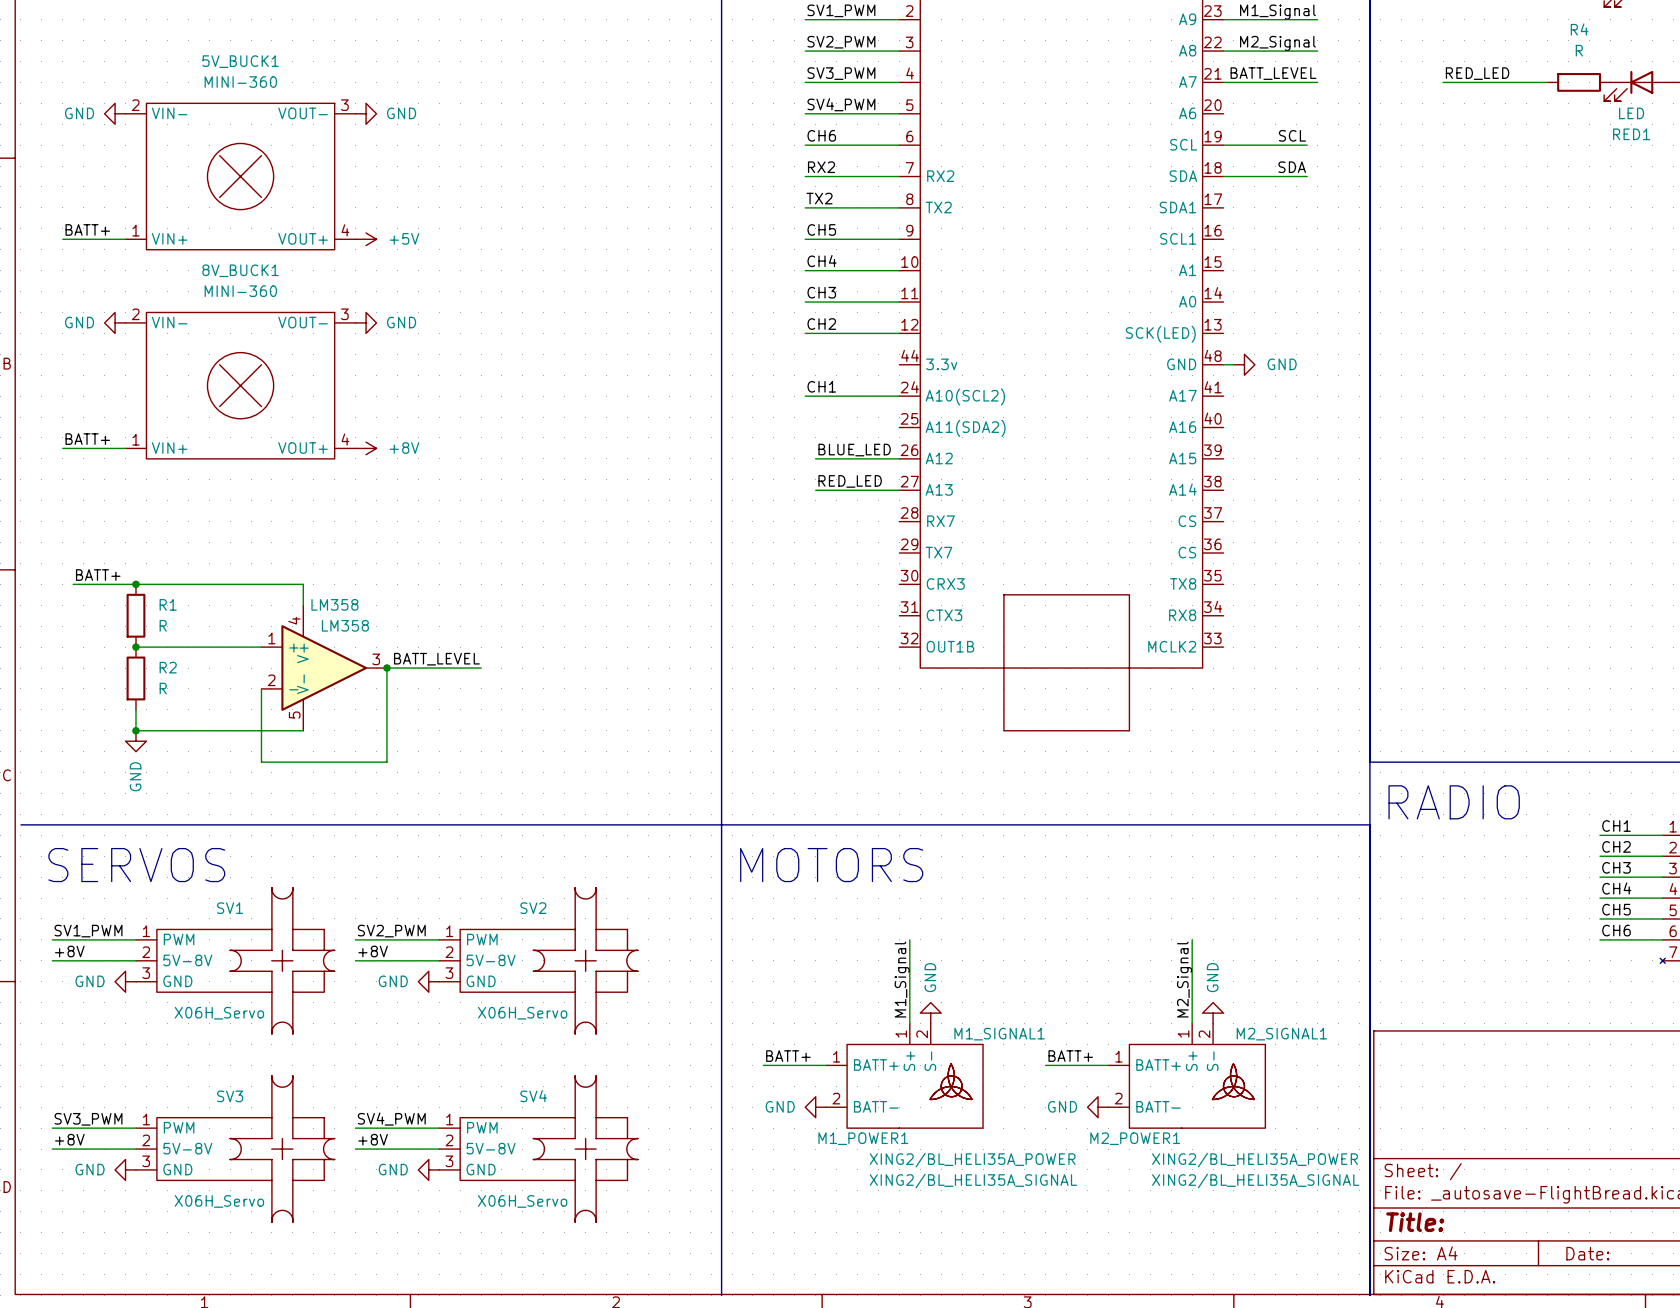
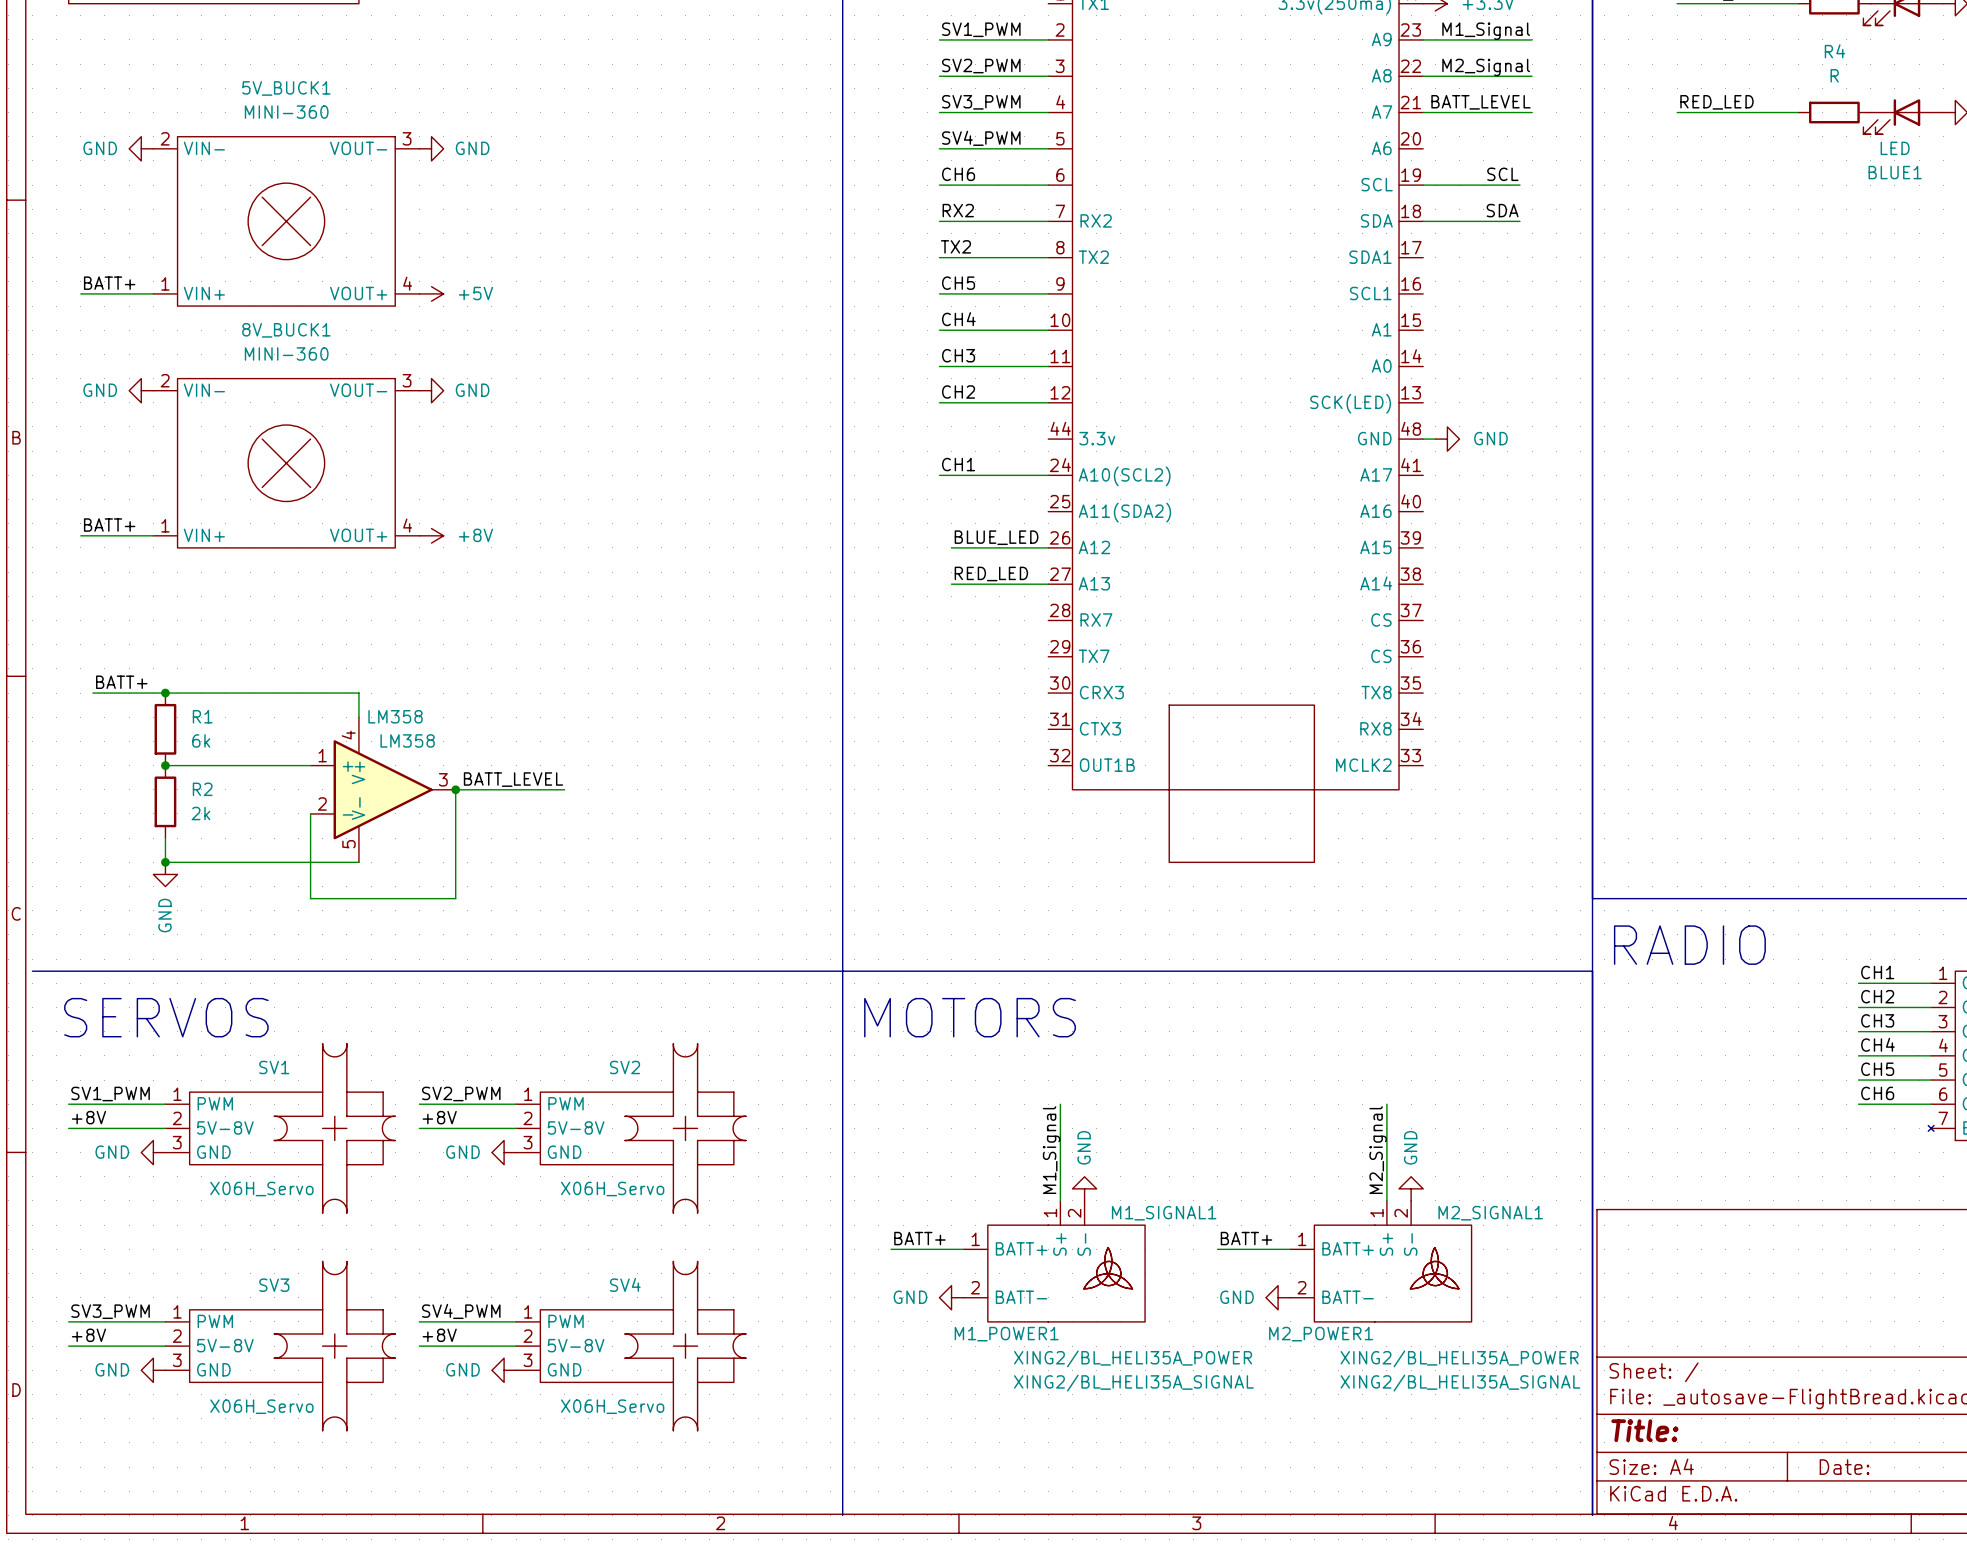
RED1 name: RED1 (1631, 134) -> BLUE1 (1895, 172)
R1 value: R (163, 625) -> 6k (201, 740)
R2 value: R (163, 688) -> 2k (200, 813)

